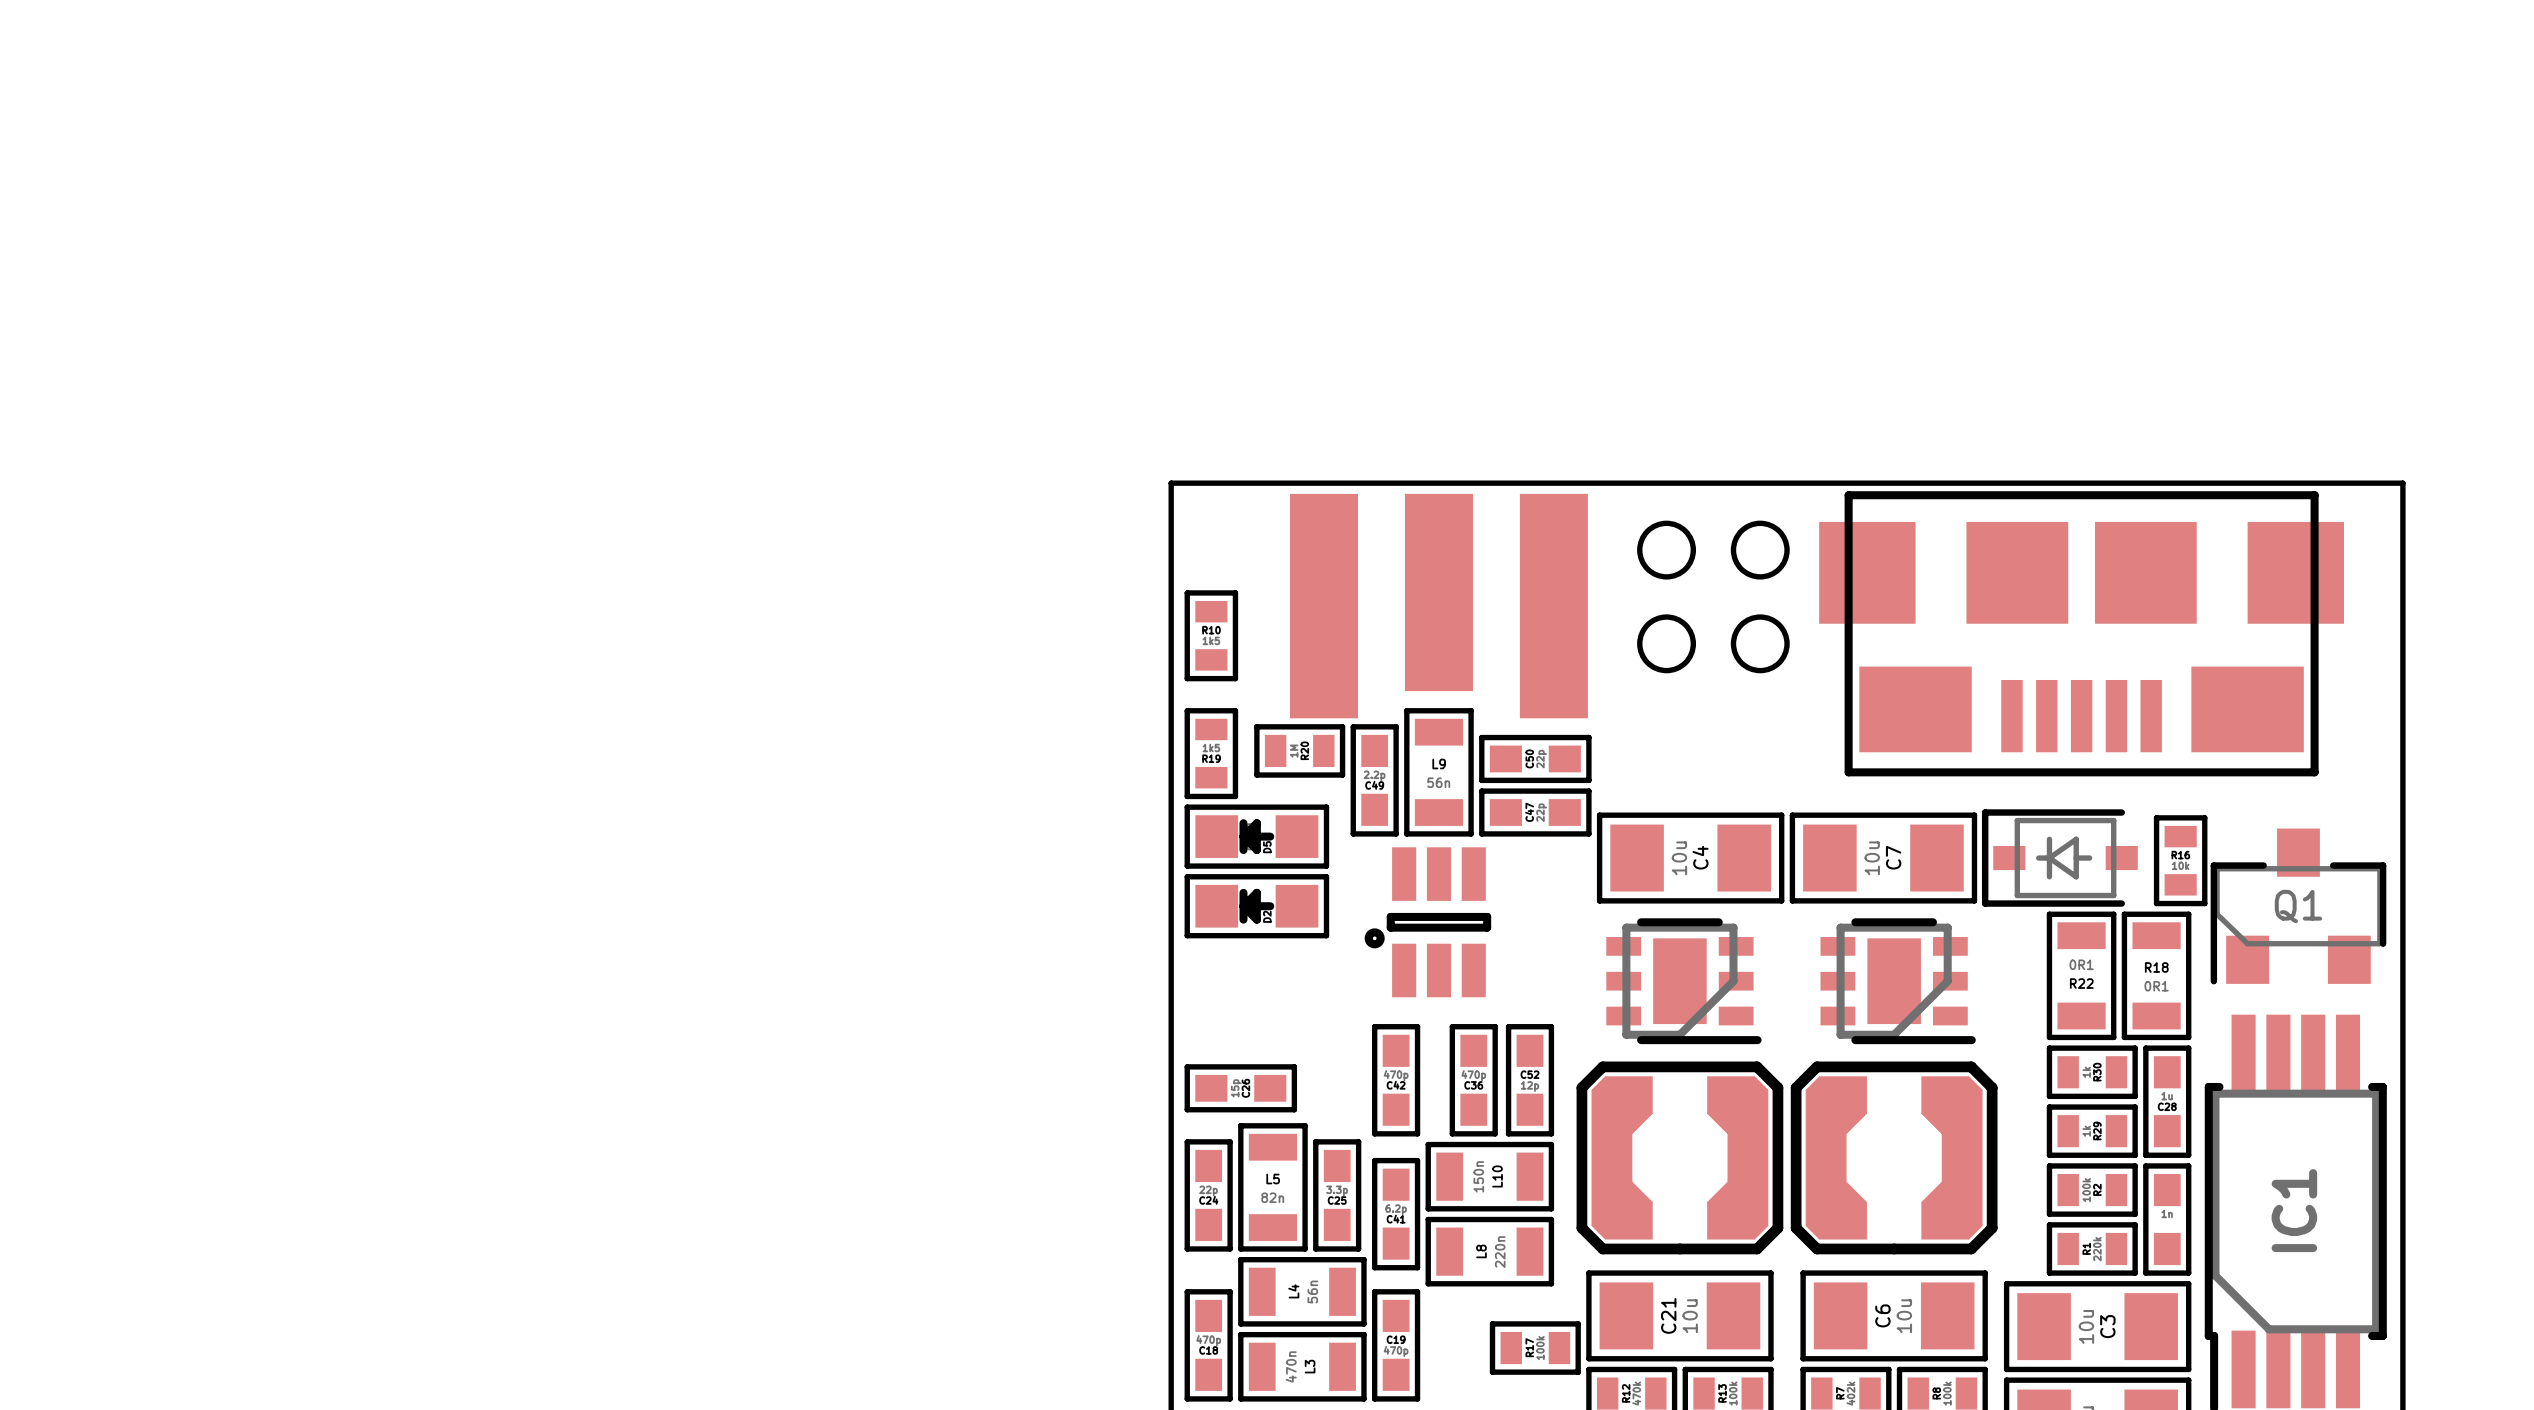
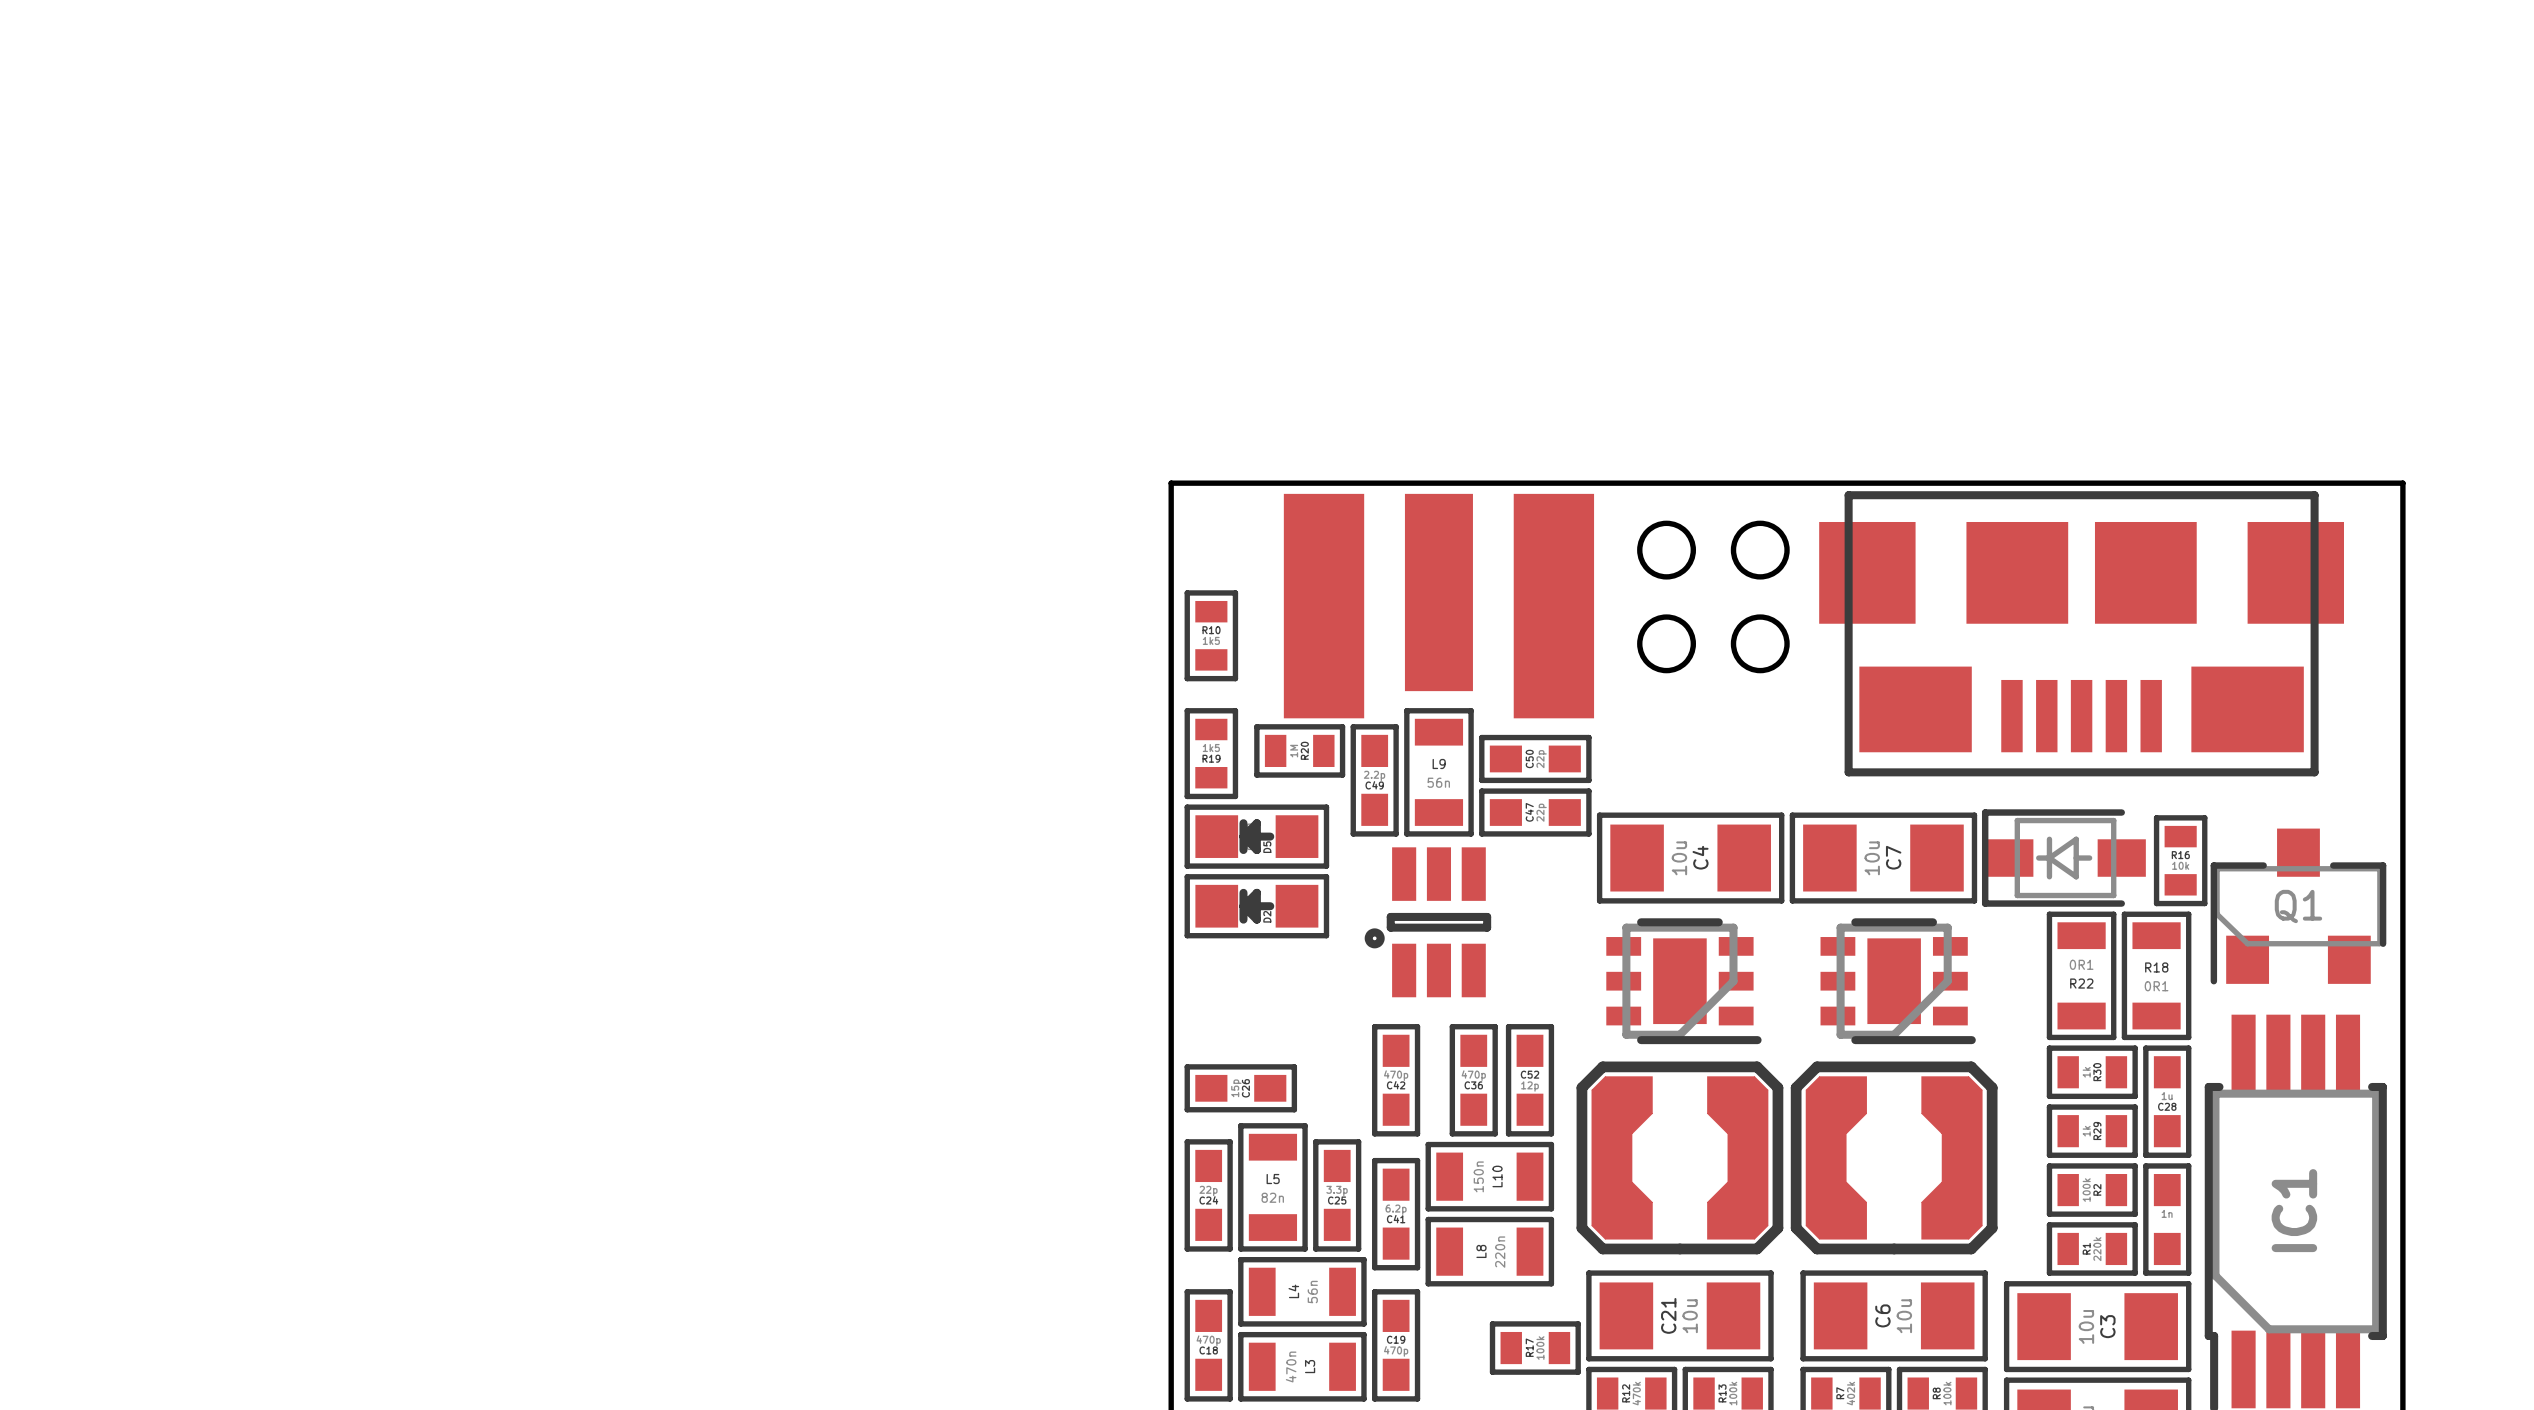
part footprint: [1290, 493, 1588, 719] -> [1283, 493, 1595, 719]
part footprint: [1981, 809, 2138, 907] -> [1981, 809, 2146, 907]

